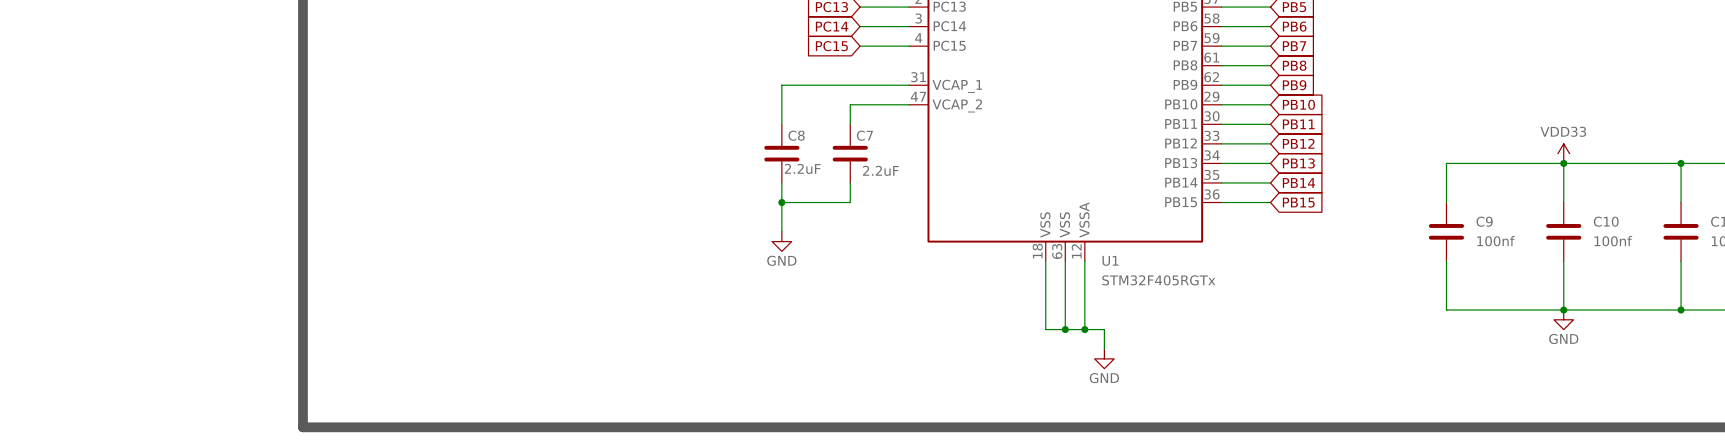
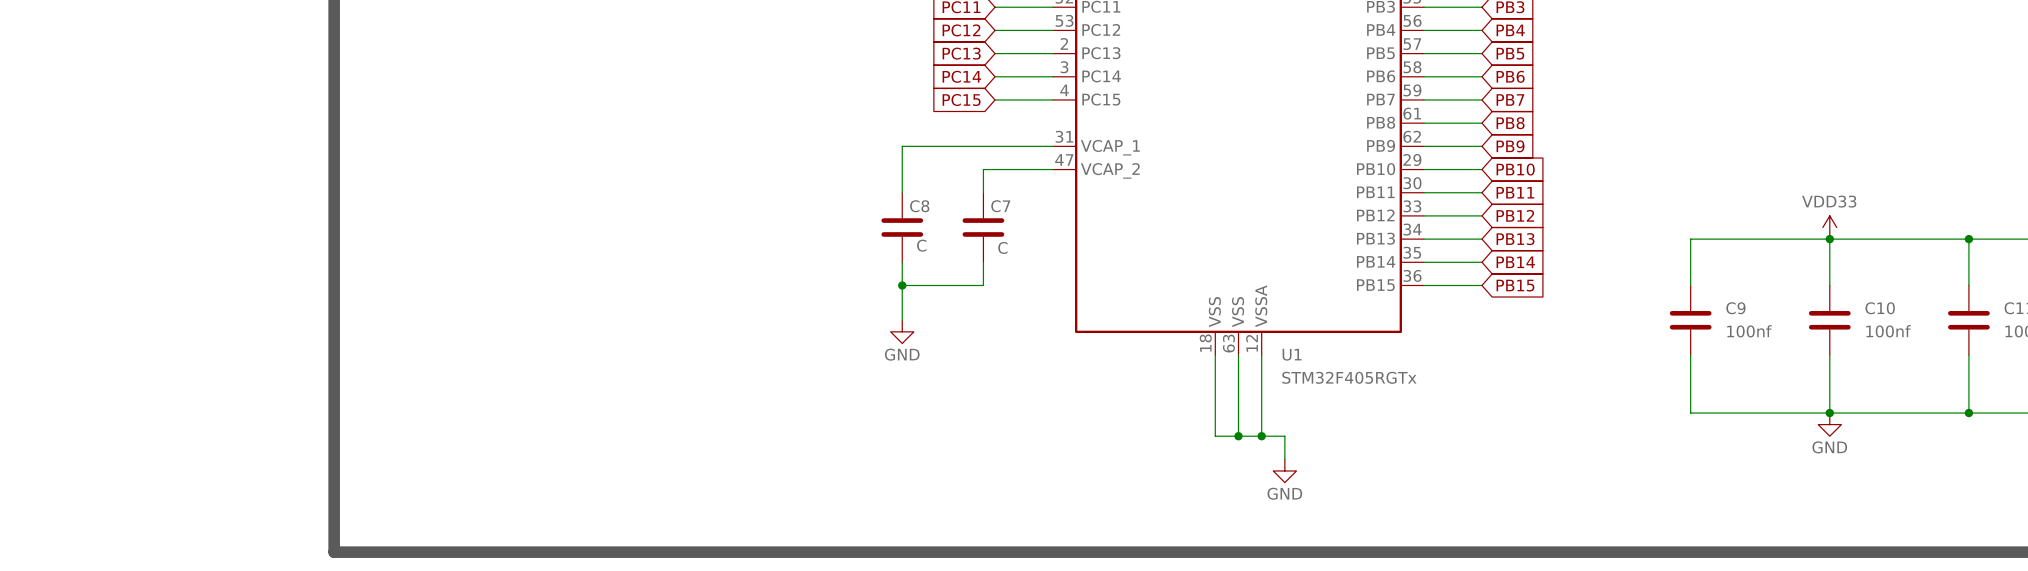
C8 value: 2.2uF (802, 168) -> C (921, 245)
C7 value: 2.2uF (880, 170) -> C (1002, 247)

